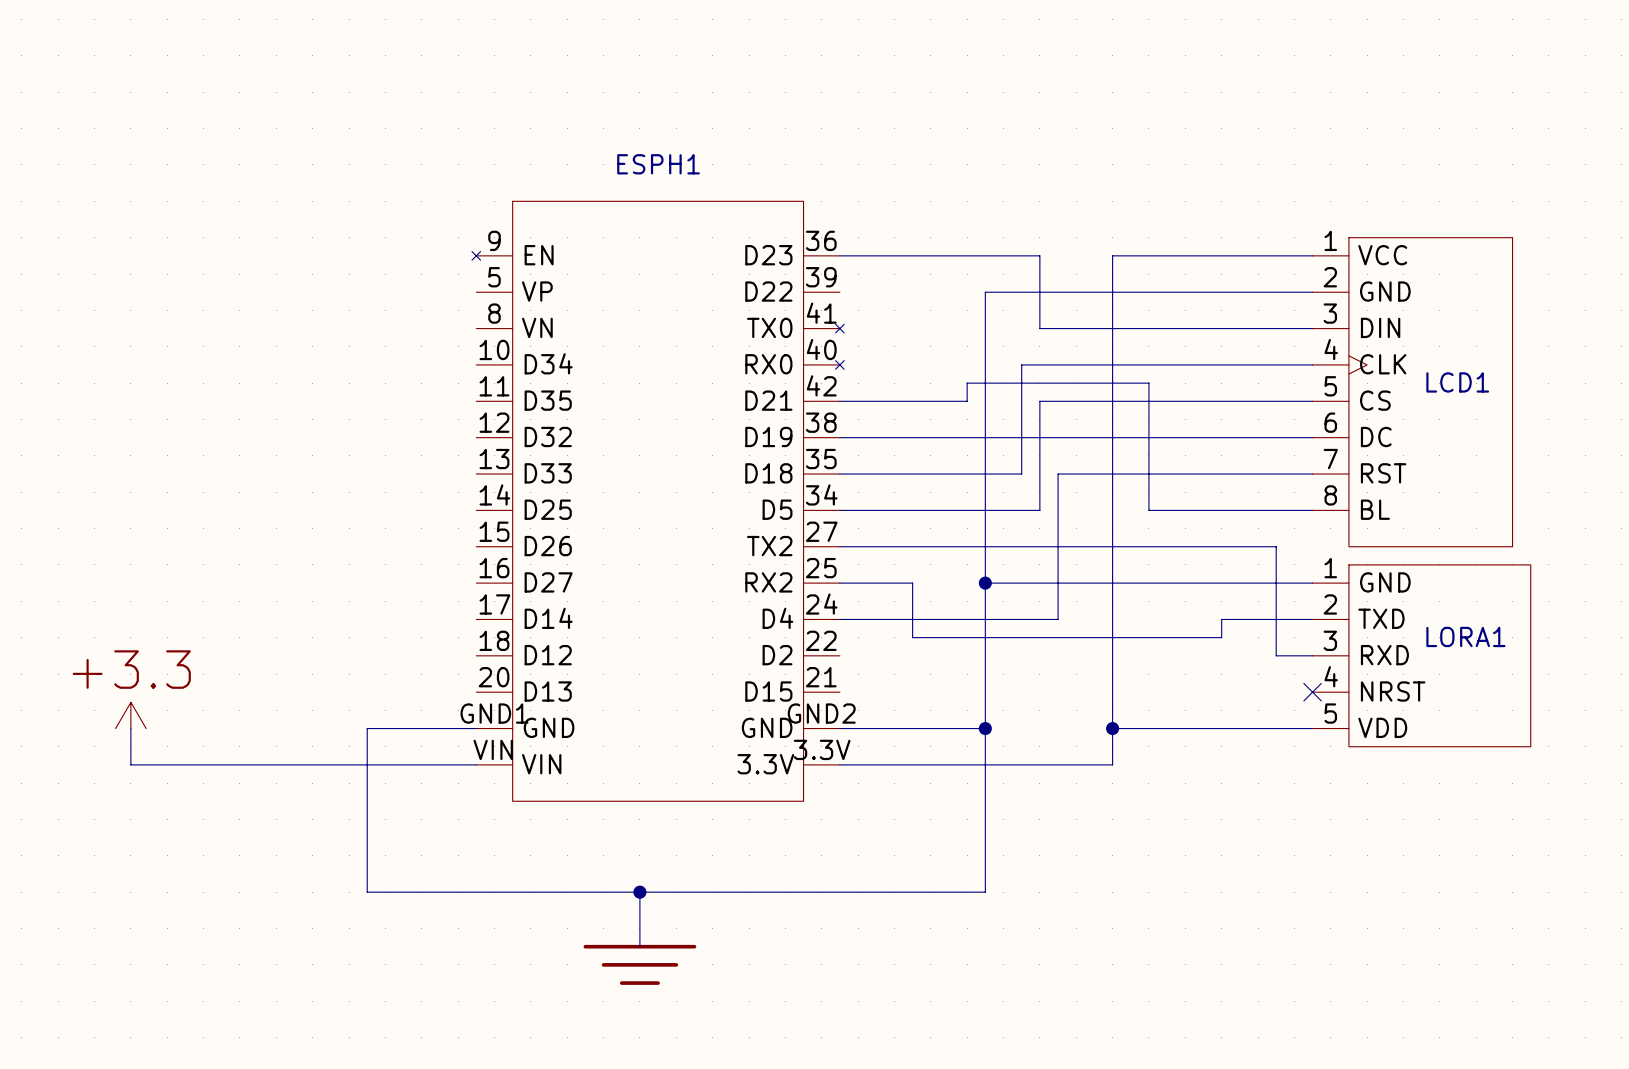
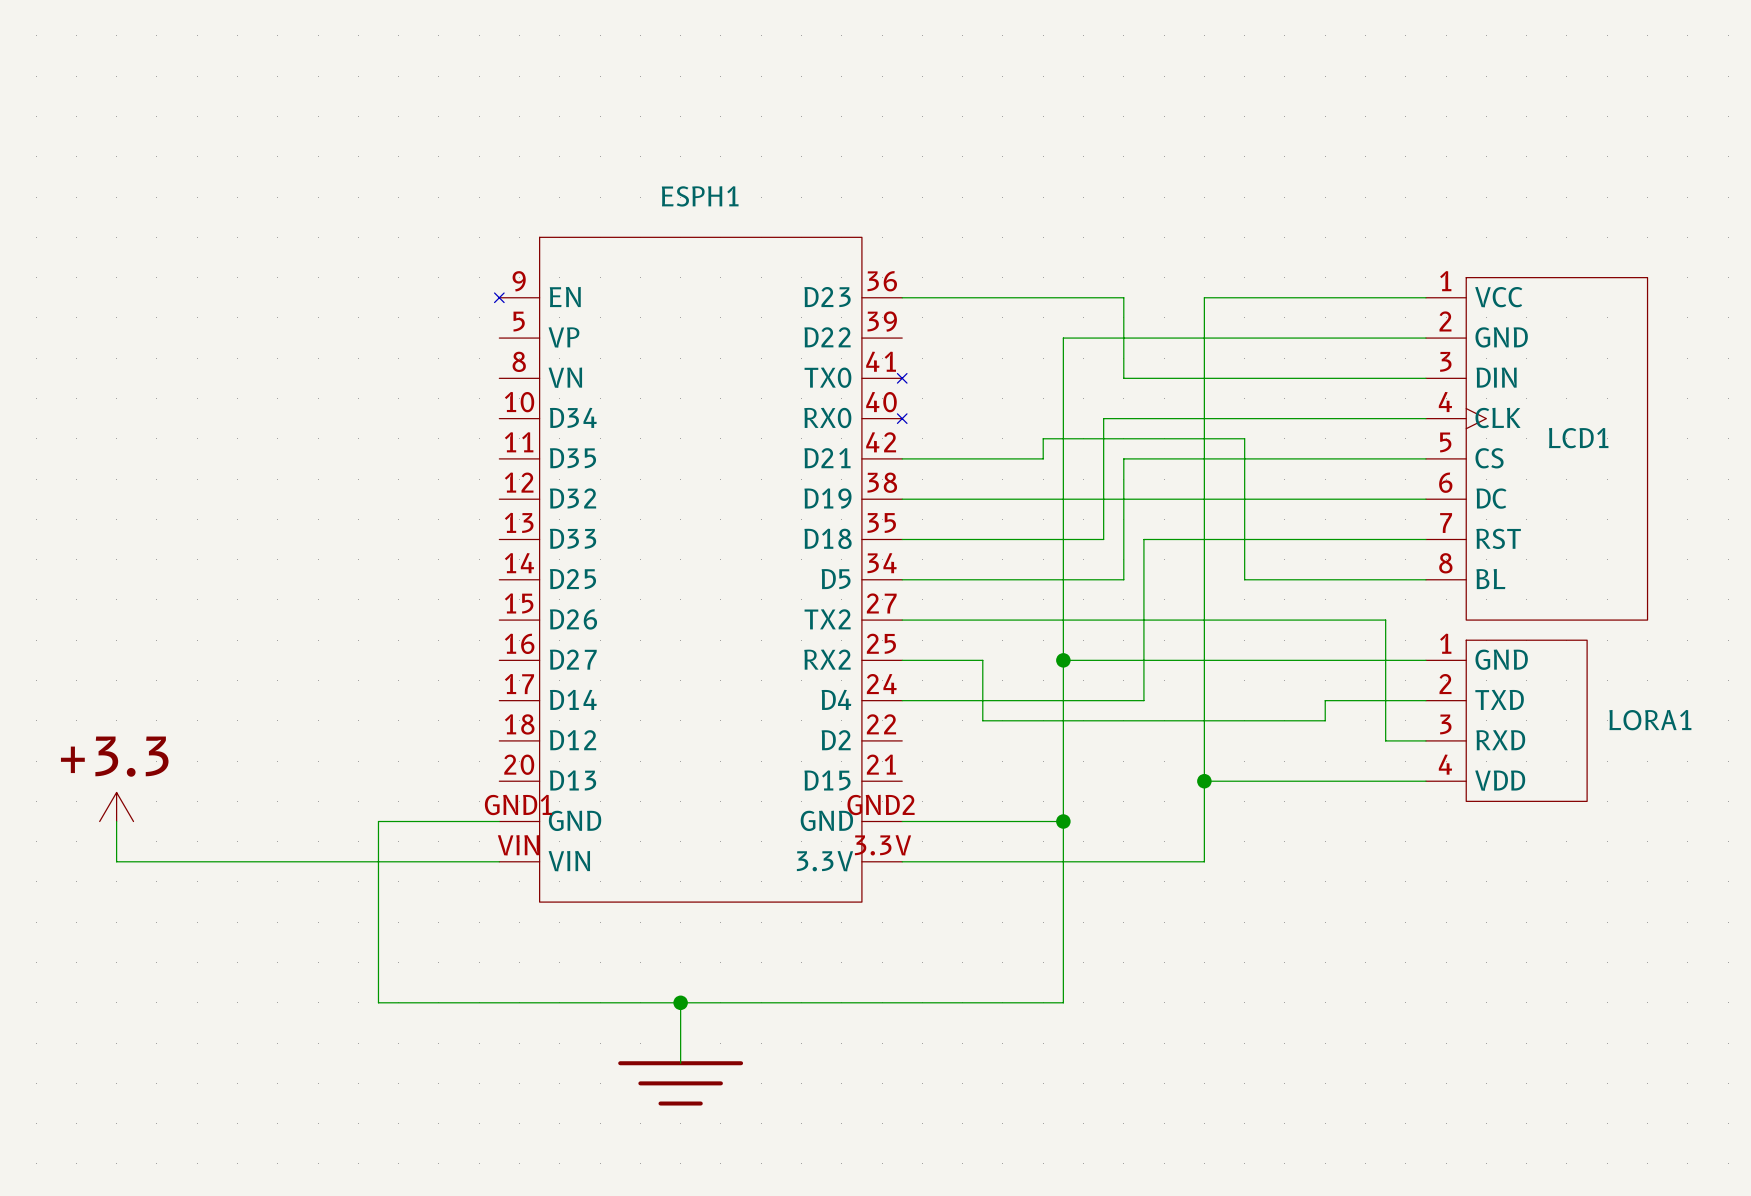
LORA1 symbol: [1312, 564, 1531, 747] -> [1425, 640, 1588, 802]
LORA1 name position: LORA1 (1465, 636) -> LORA1 (1650, 720)
no-connect mark: (1312, 692) -> none
wire: (1112, 728) (1312, 728) -> (1204, 781) (1425, 781)
junction position: (1112, 728) -> (1204, 781)

